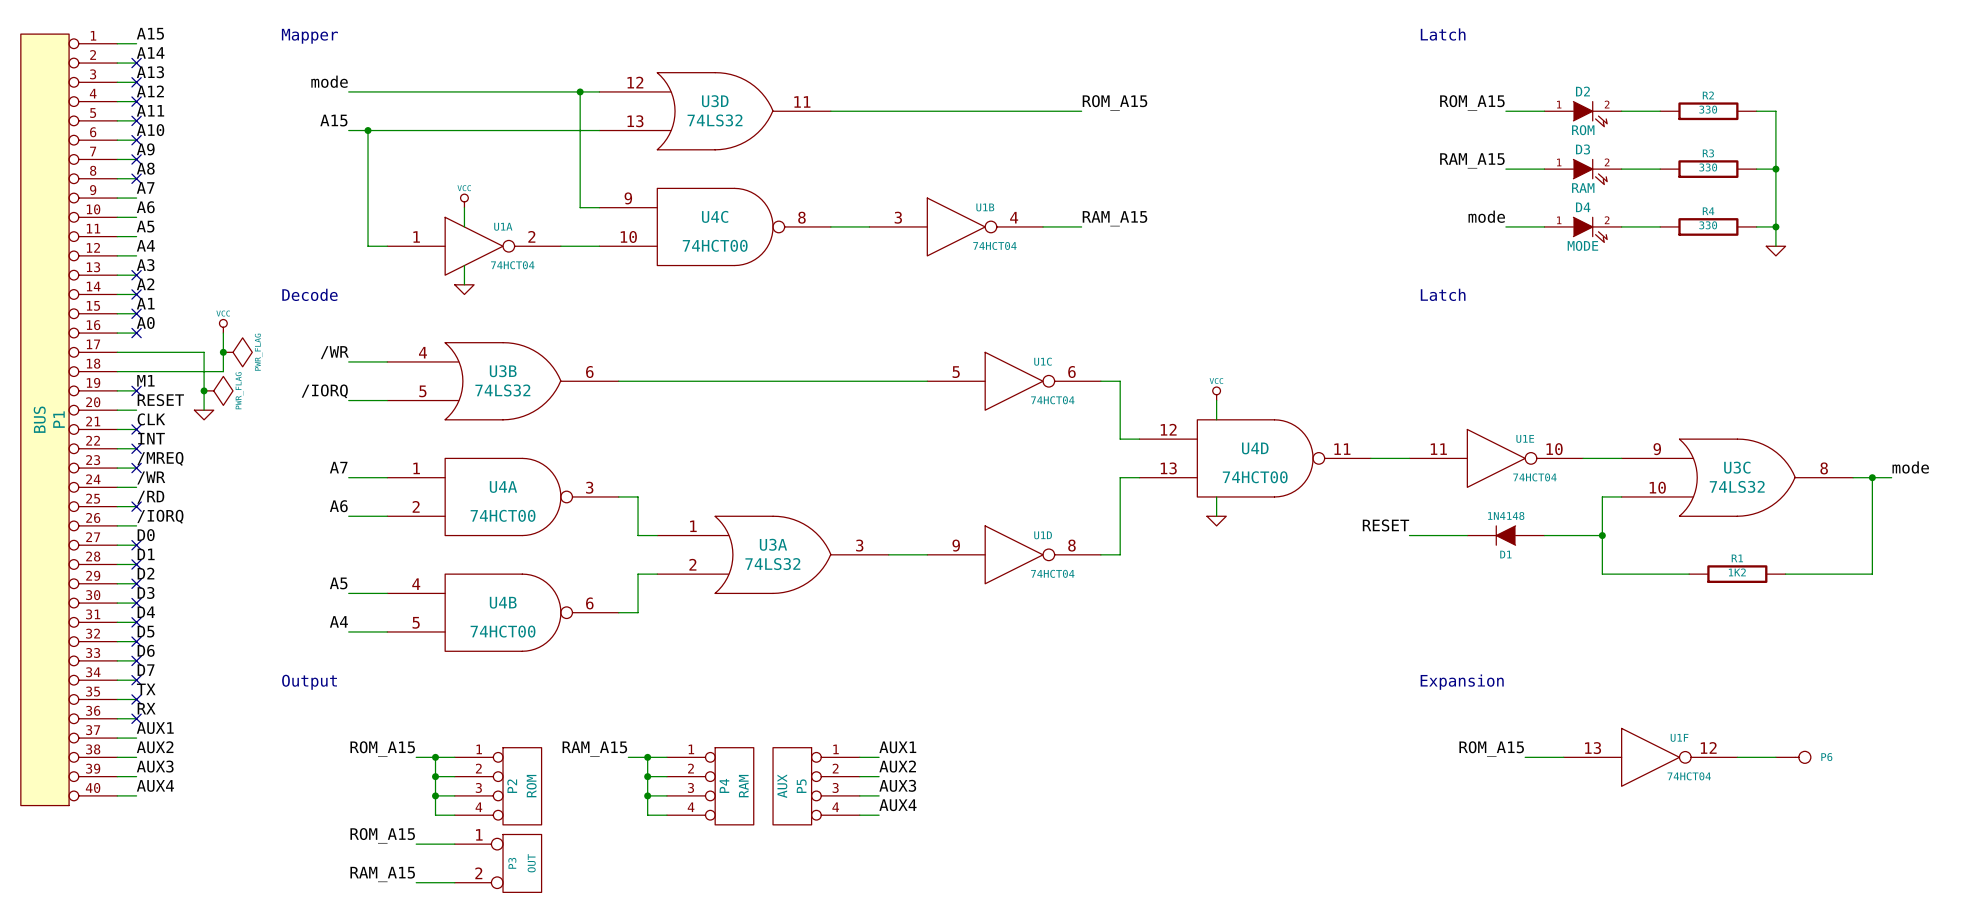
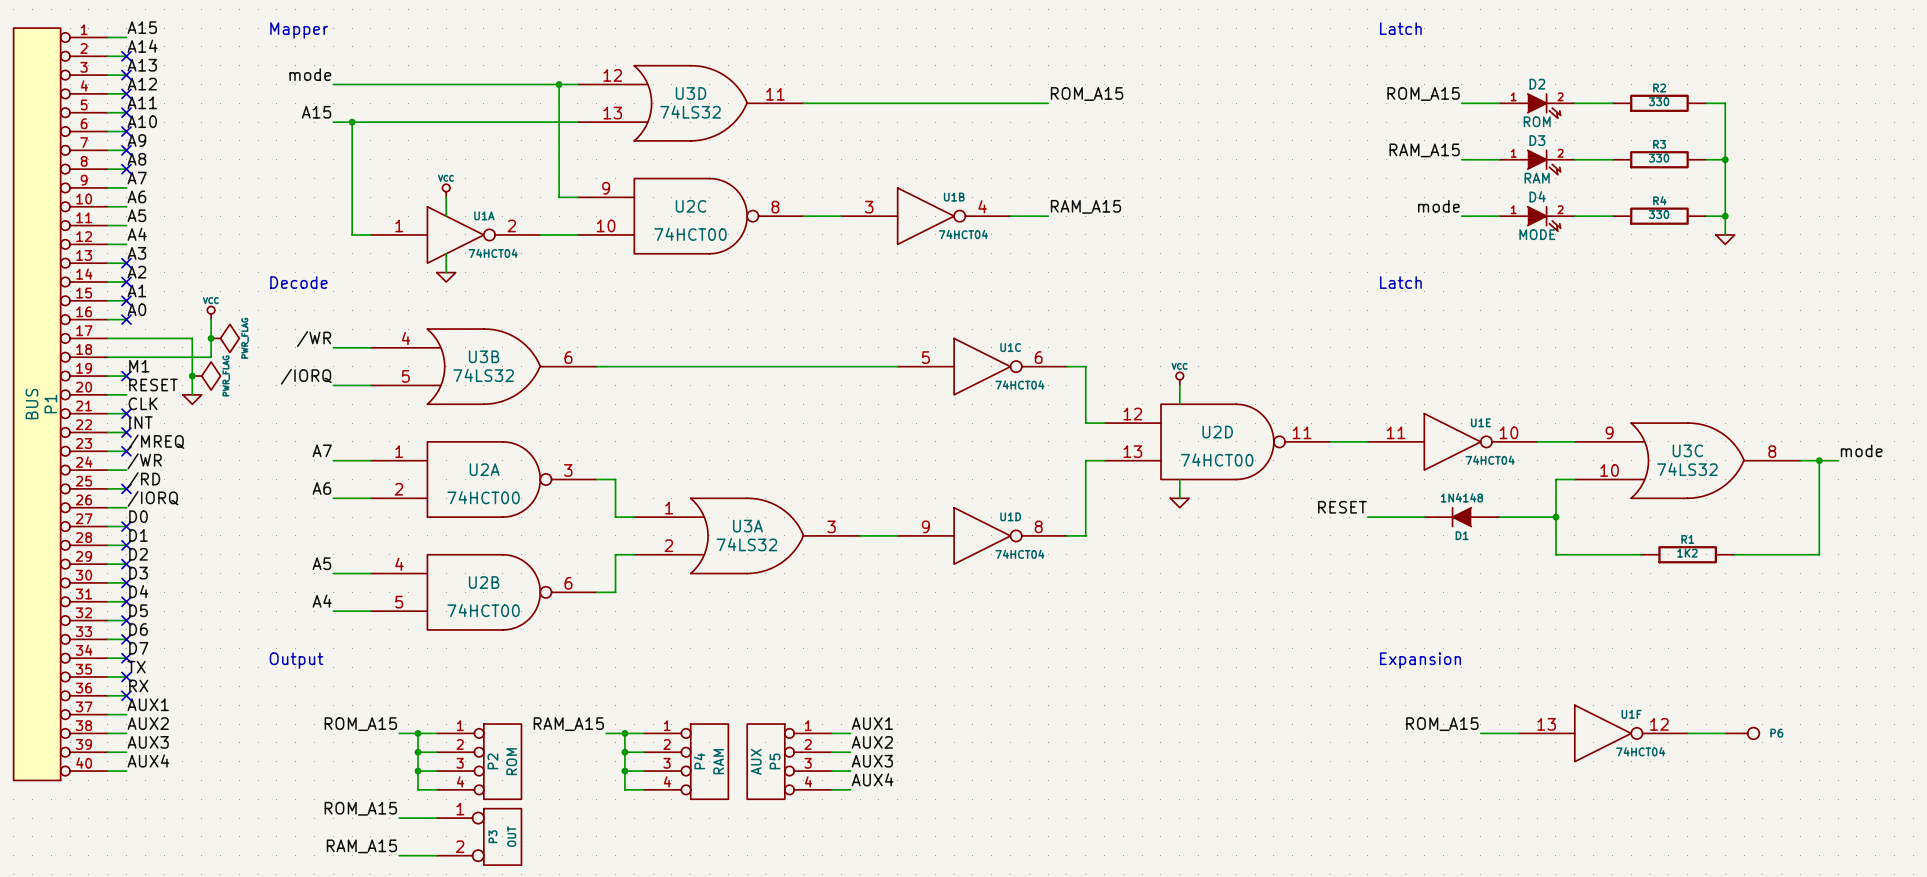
U4C name: U4C (715, 216) -> U2C (691, 206)
U4D name: U4D (1255, 448) -> U2D (1217, 432)
U4A name: U4A (503, 487) -> U2A (484, 469)
U4B name: U4B (503, 602) -> U2B (484, 582)

